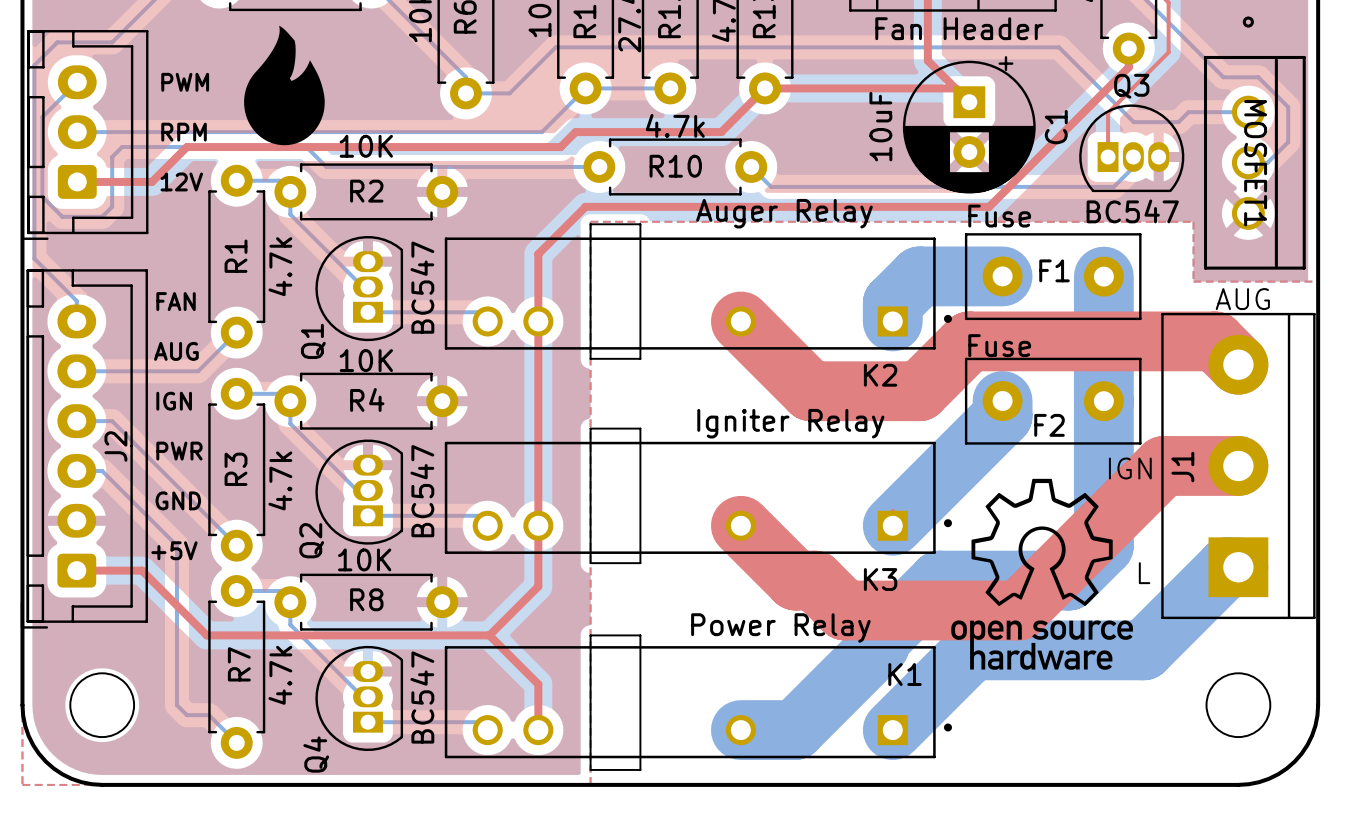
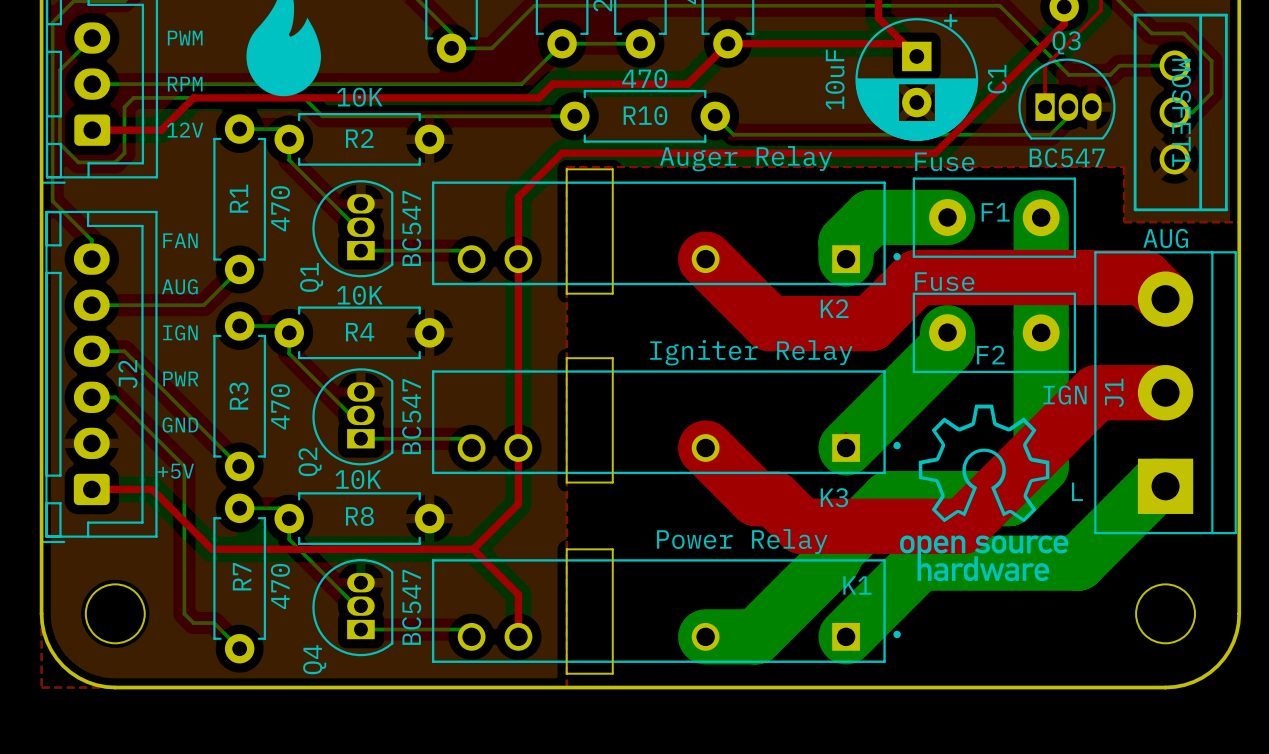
R10 value: 4.7k (675, 125) -> 470 (644, 78)
R1 value: 4.7k (280, 266) -> 470 (280, 208)
R3 value: 4.7k (280, 480) -> 470 (280, 406)
R7 value: 4.7k (280, 675) -> 470 (280, 586)

